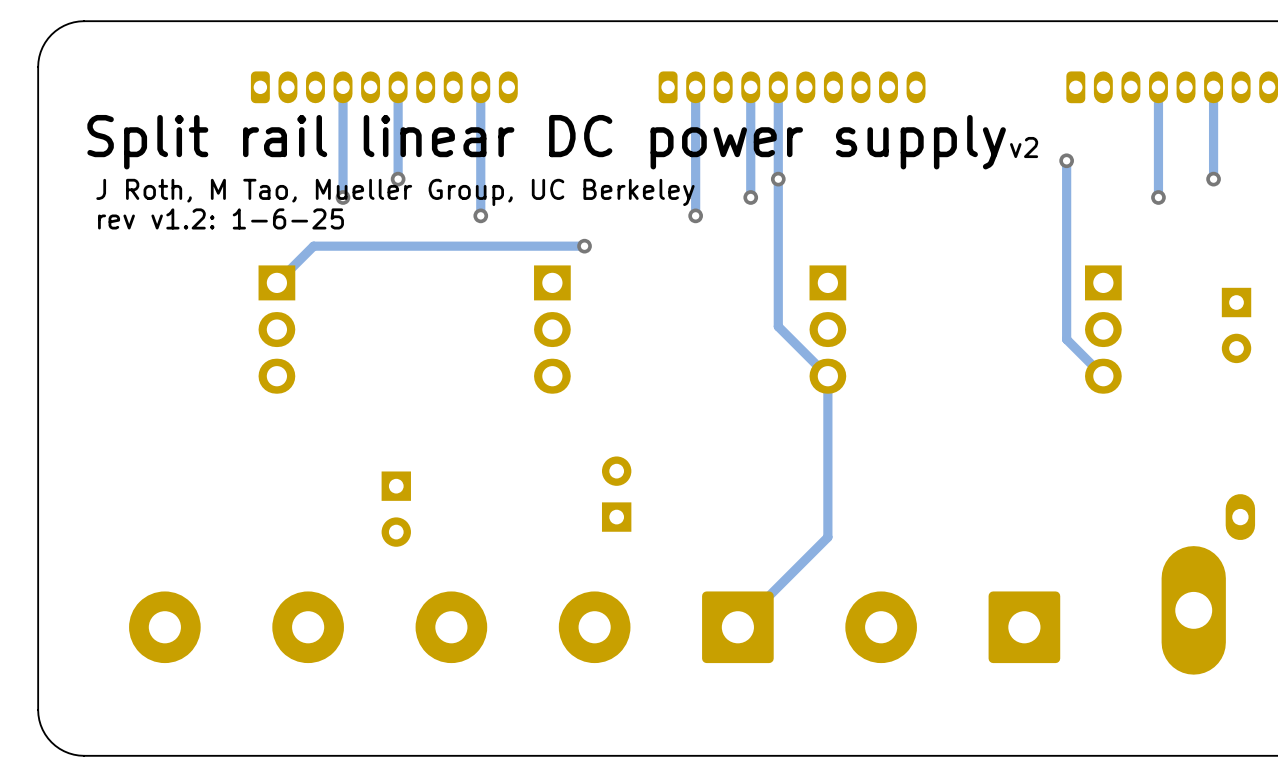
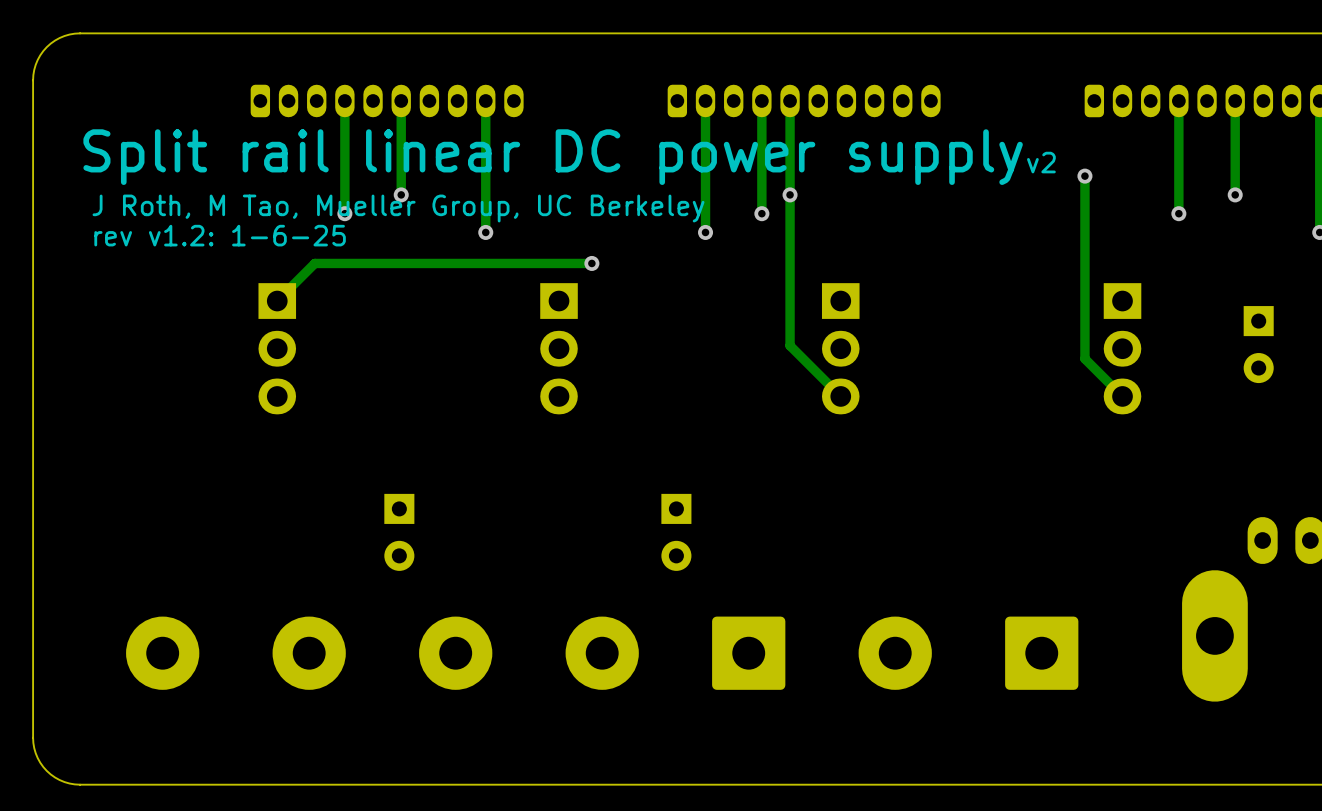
track: (827, 376) (827, 537) (737, 627) -> none
part rotation: 0° (616, 494) -> 180° (676, 532)
part position: (616, 494) -> (676, 532)

